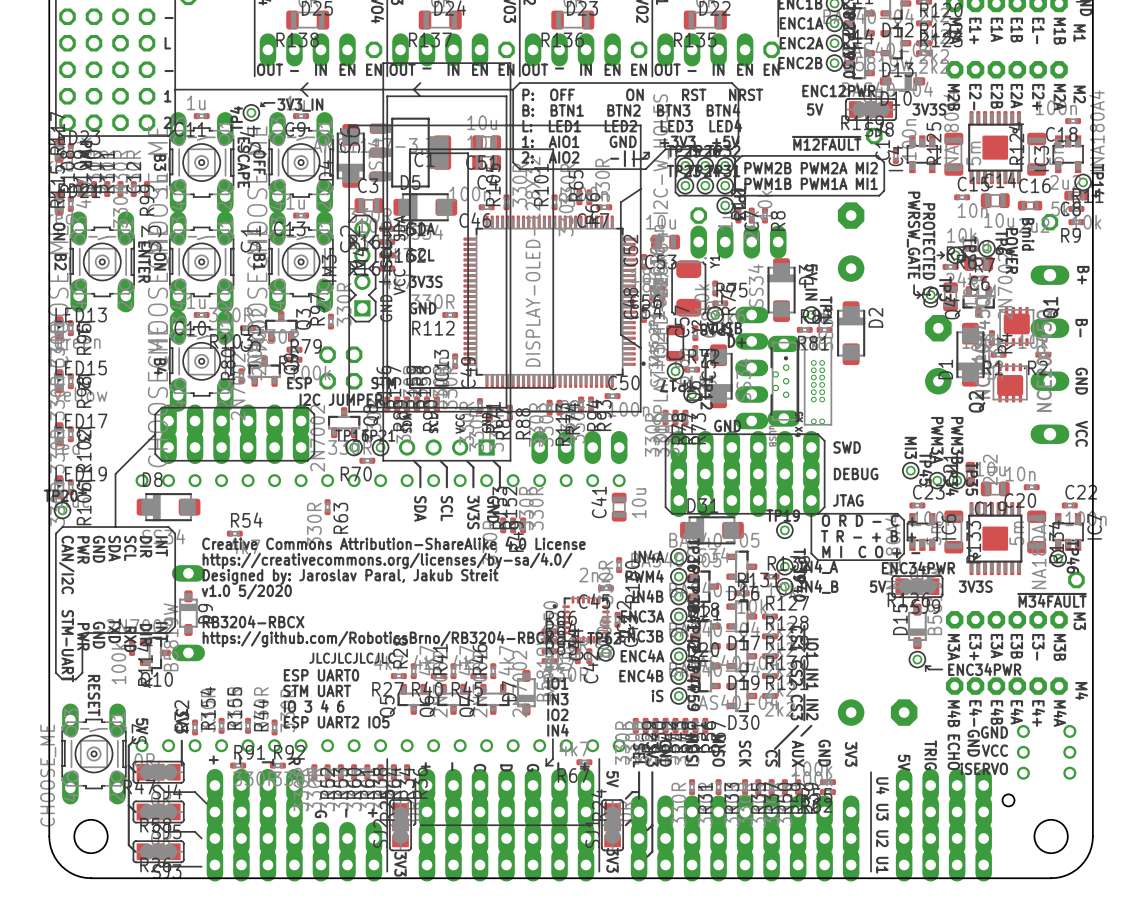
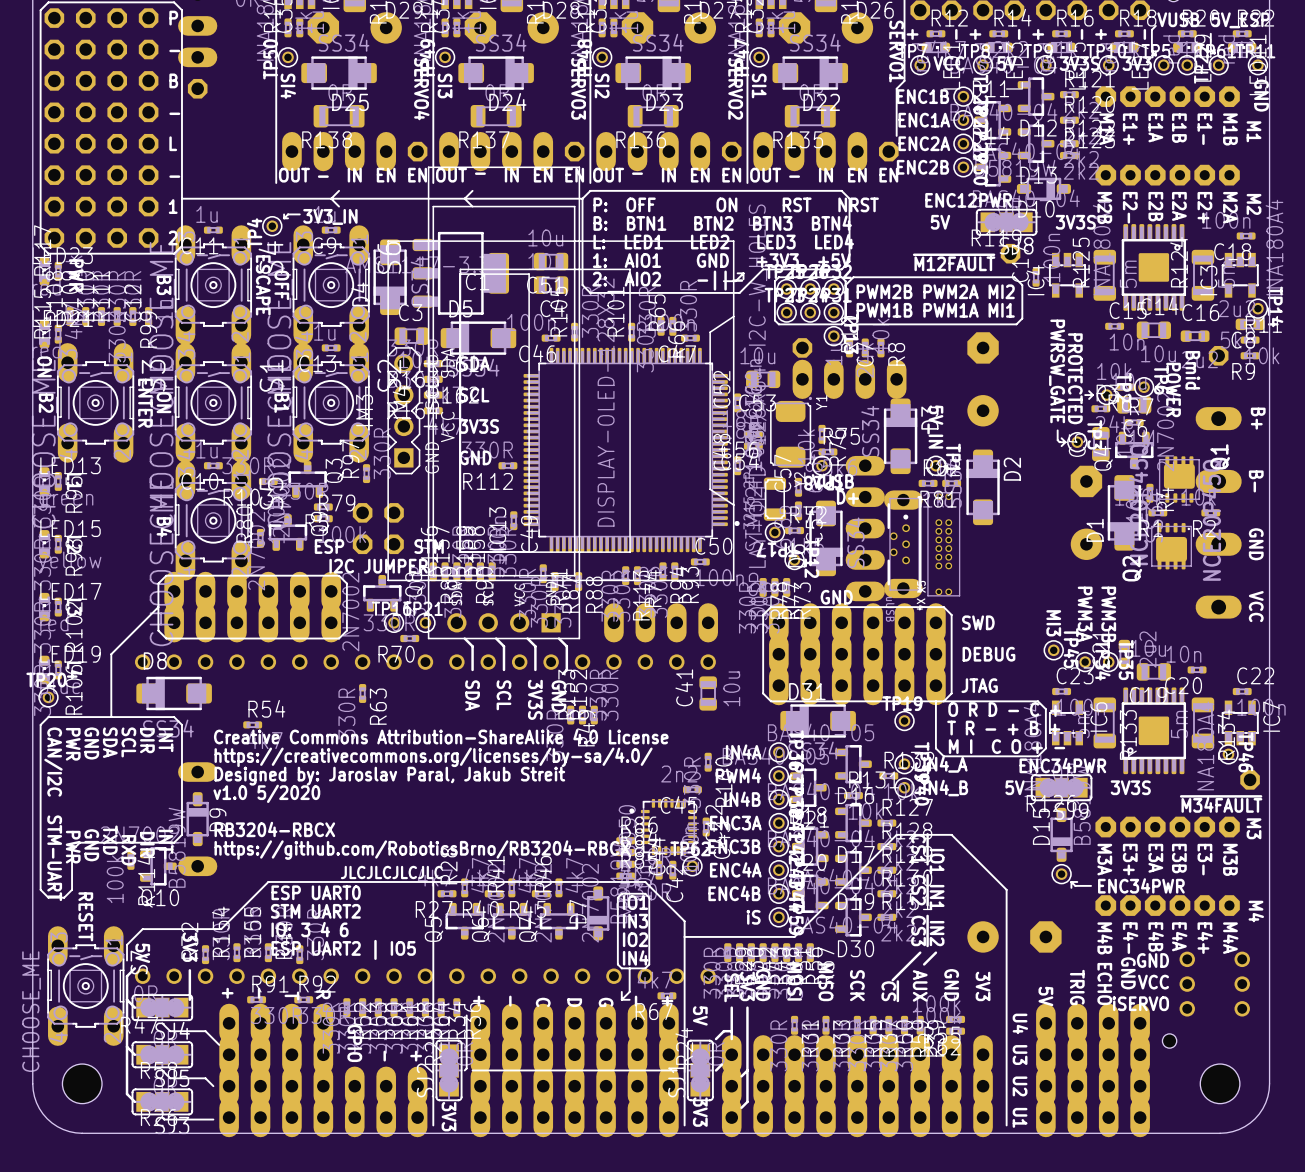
line: none -> (433, 881) (433, 991)
text position: ESP UART0 (321, 675) -> ESP UART0 (316, 892)
line: none -> (621, 893) (645, 893) (649, 897) (649, 964) (645, 968) (621, 968) (617, 964) (617, 897) (621, 893)
text: STM UART (317, 690) -> STM UART2 (315, 911)
text: IO 3 4 6 (314, 706) -> IO: 3 4 6 (310, 929)
line: none -> (684, 936) (794, 936) (896, 834) (951, 834) (1006, 889) (1006, 1007)
text: ESP UART2 IO5 (336, 722) -> ESP UART2 | IO5 (343, 949)
line: none -> (127, 960) (127, 944) (142, 929) (221, 929) (268, 881) (645, 881) (684, 921) (684, 991)
text: G (320, 814) -> GPIO (354, 1043)

